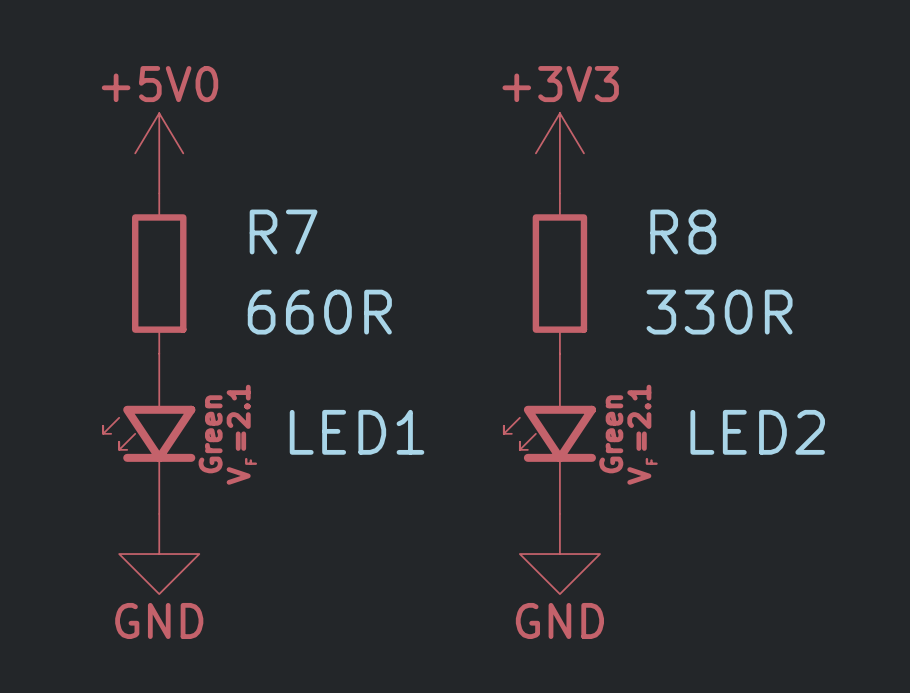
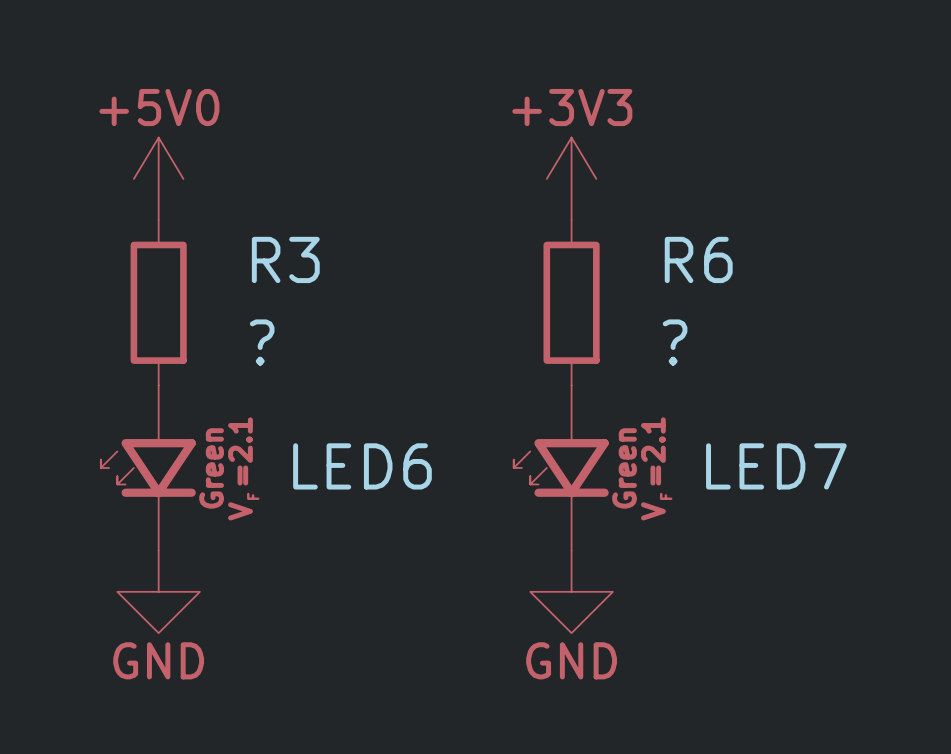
R7 name: R7 (283, 231) -> R3 (285, 259)
R8 name: R8 (683, 231) -> R6 (698, 259)
R7 value: 660R (319, 312) -> ? (262, 342)
R8 value: 330R (719, 312) -> ? (675, 342)
LED1 name: LED1 (357, 432) -> LED6 (362, 466)
LED2 name: LED2 (757, 432) -> LED7 (776, 466)

